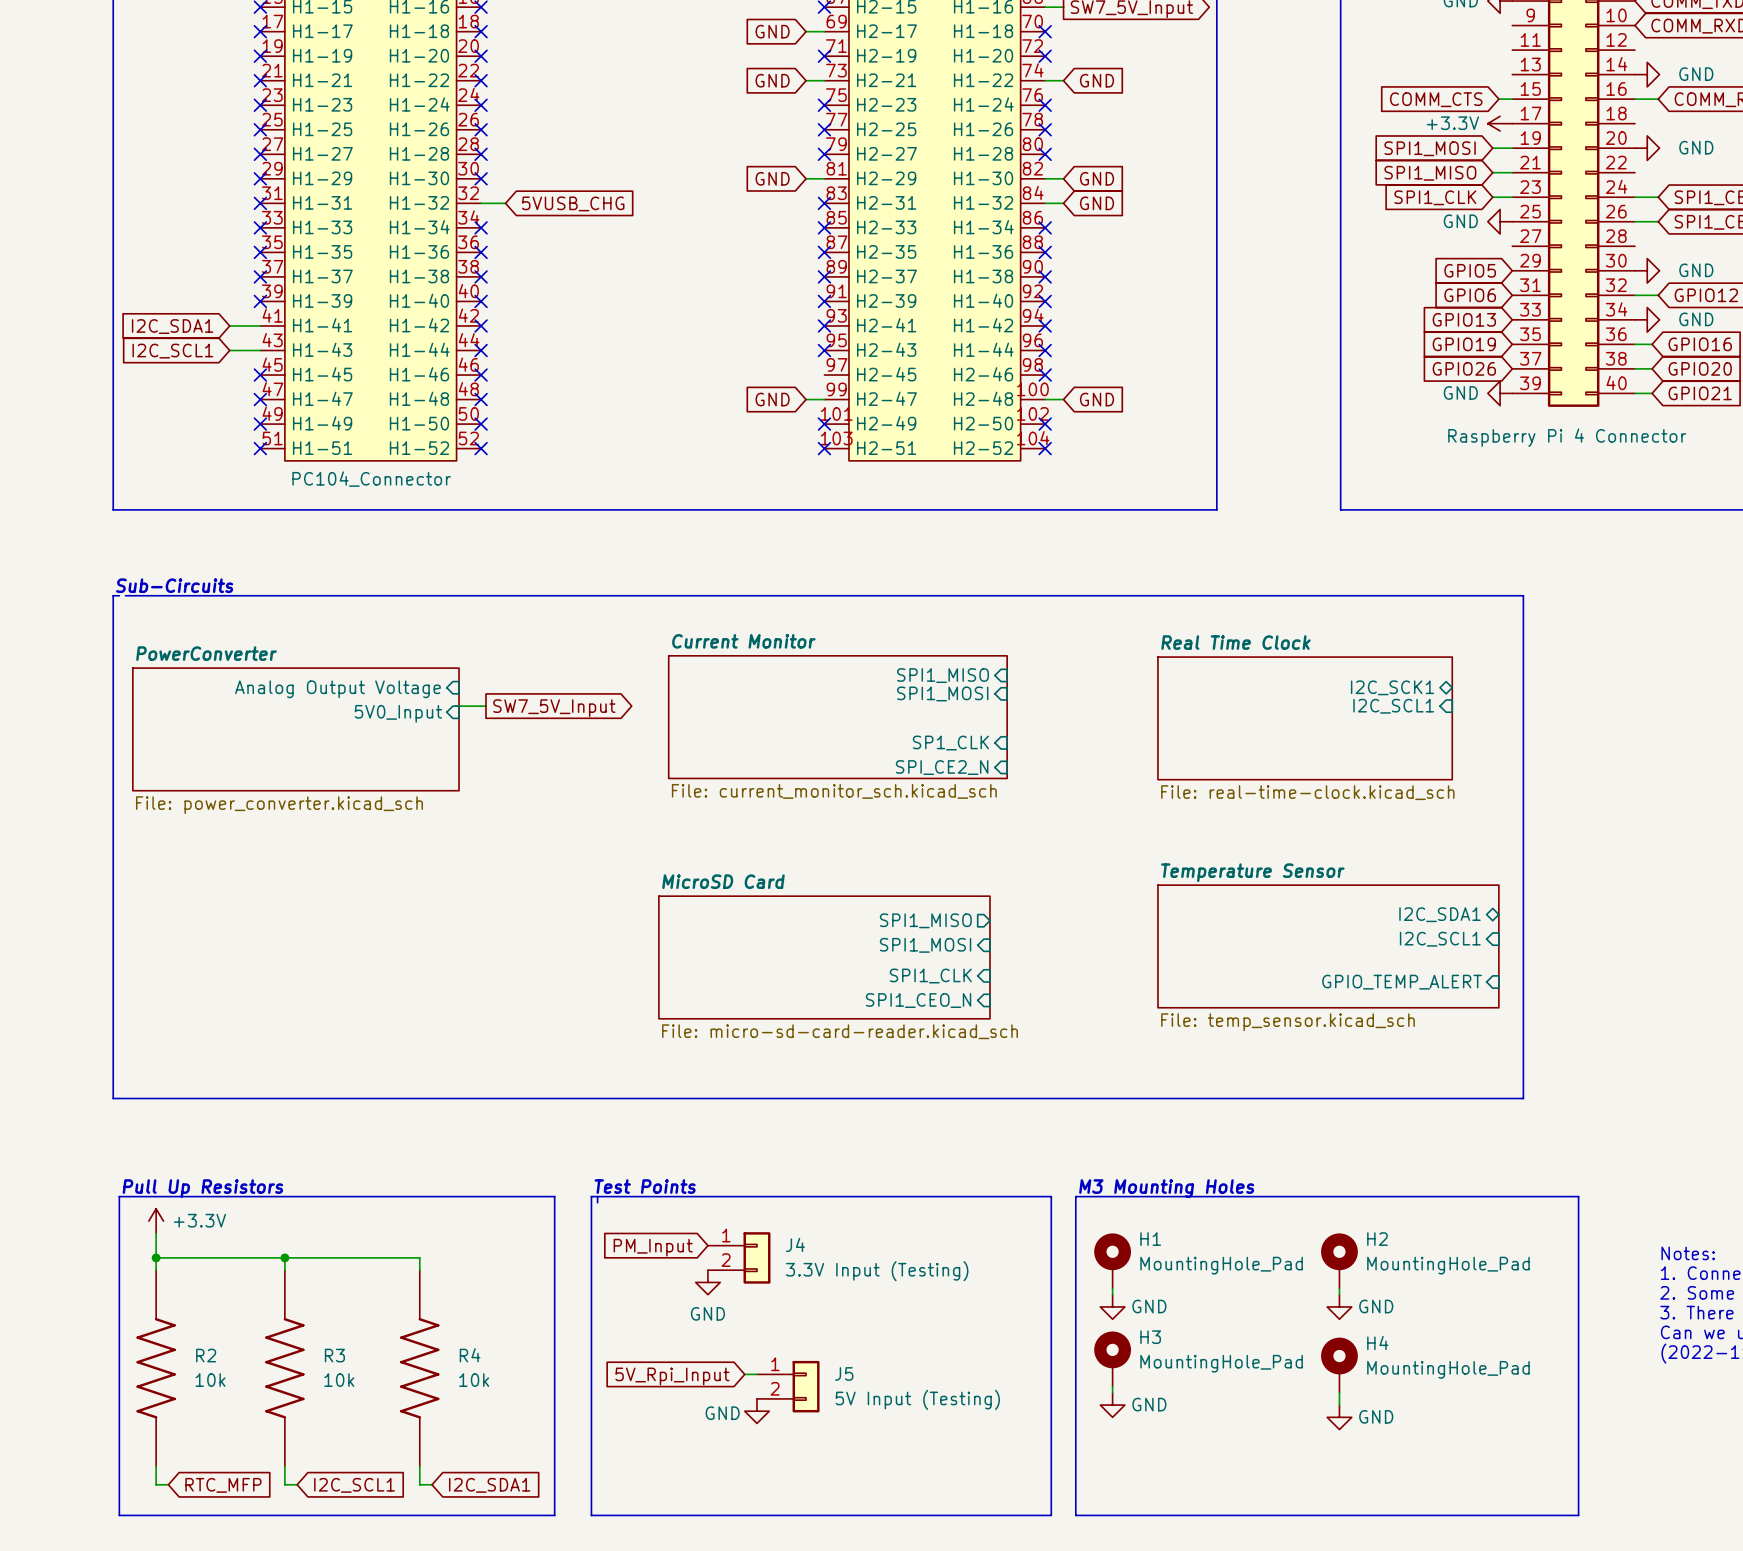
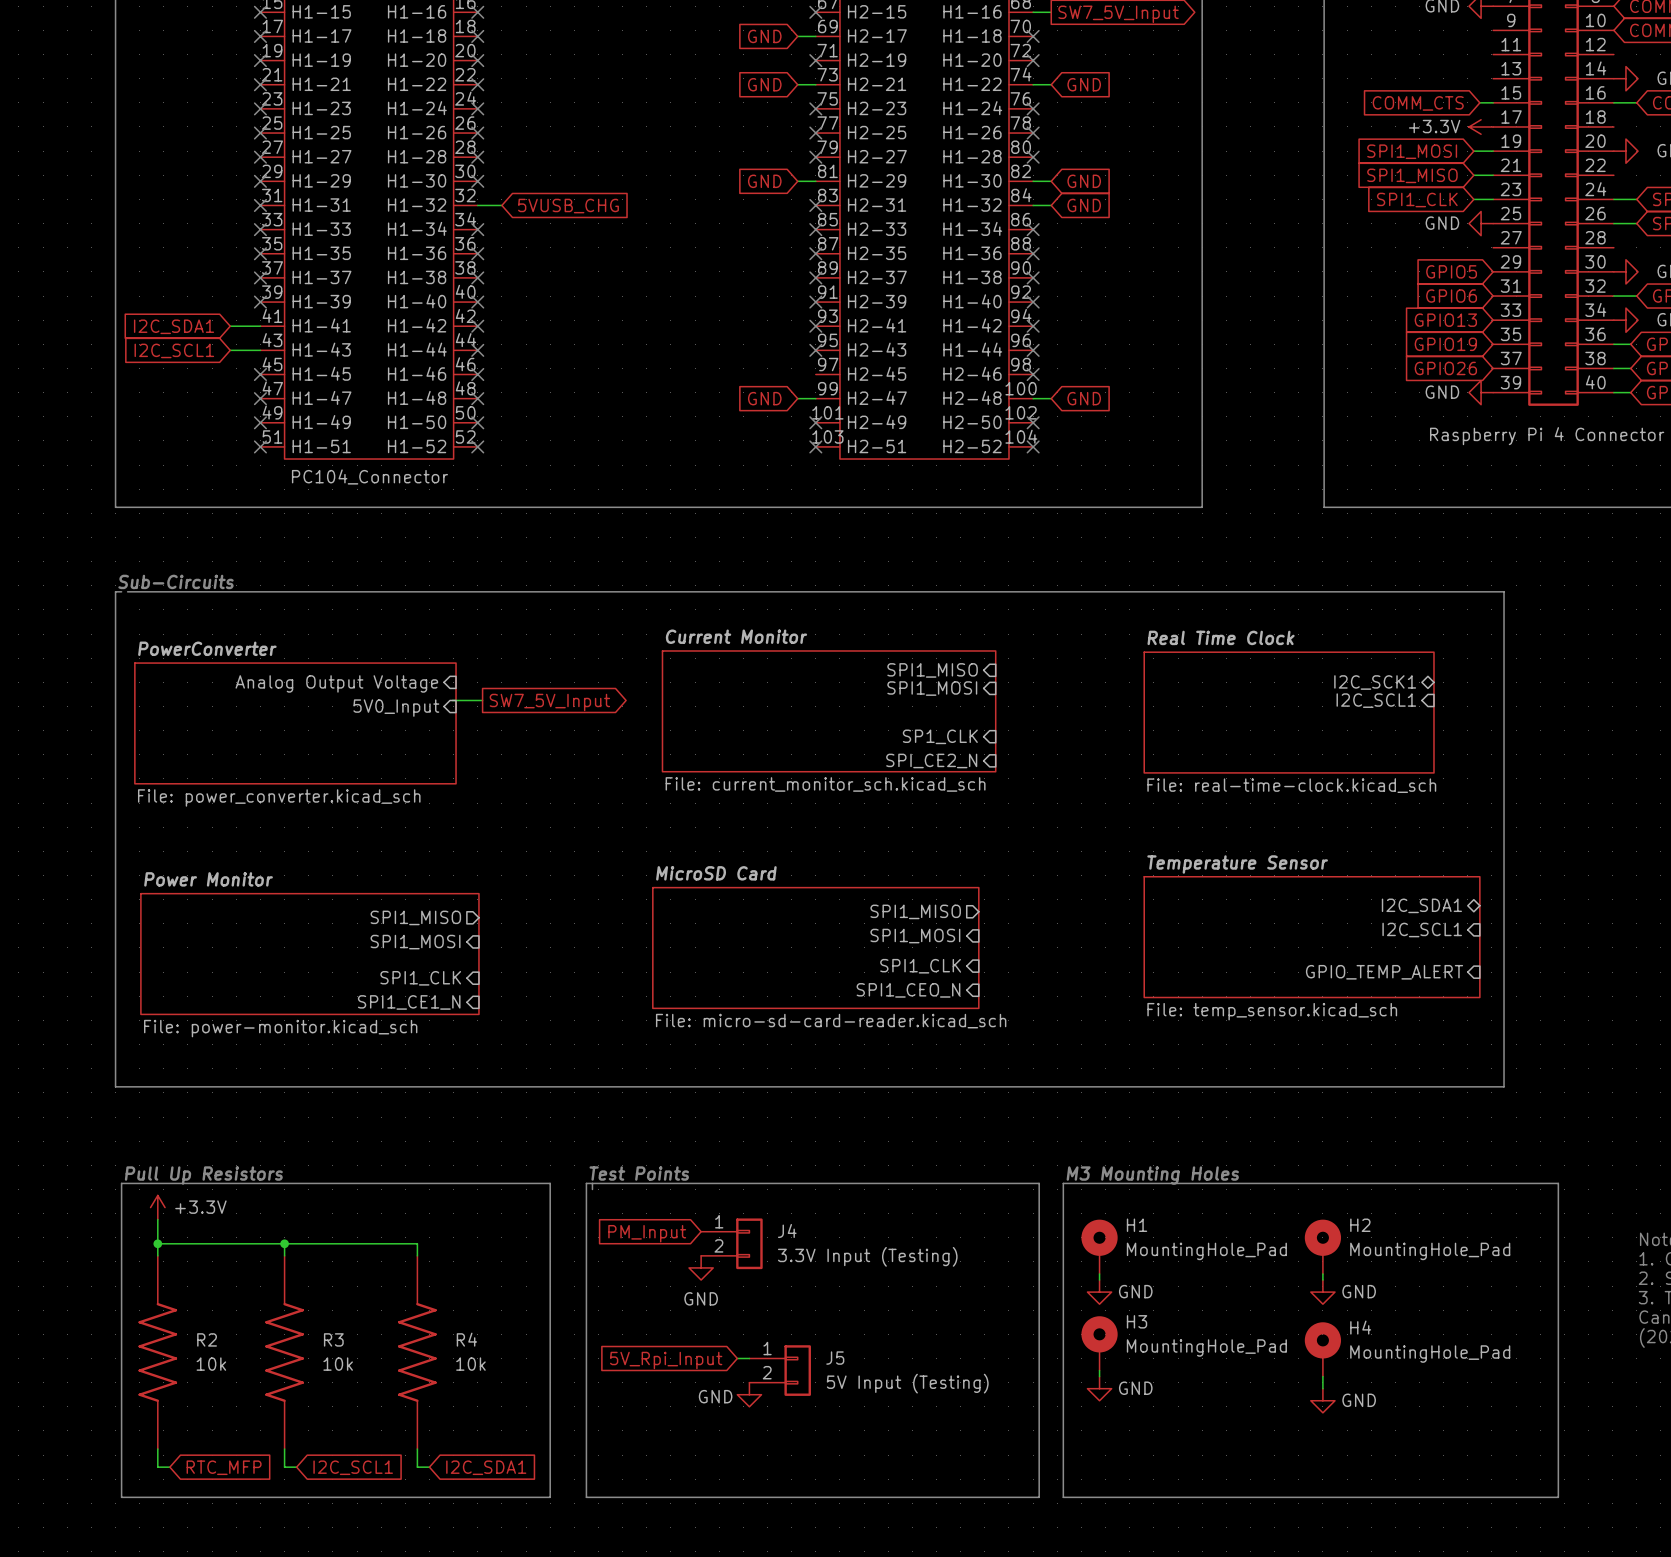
sheet pin: none -> SPI1_MISO (415, 917)
sheet pin: none -> SPI1_MOSI (415, 942)
sheet Power Monitor: none -> File: power-monitor.kicad_sch (309, 954)
sheet pin: none -> SPI1_CLK (420, 978)
sheet pin: none -> SPI1_CE1_N (409, 1002)

